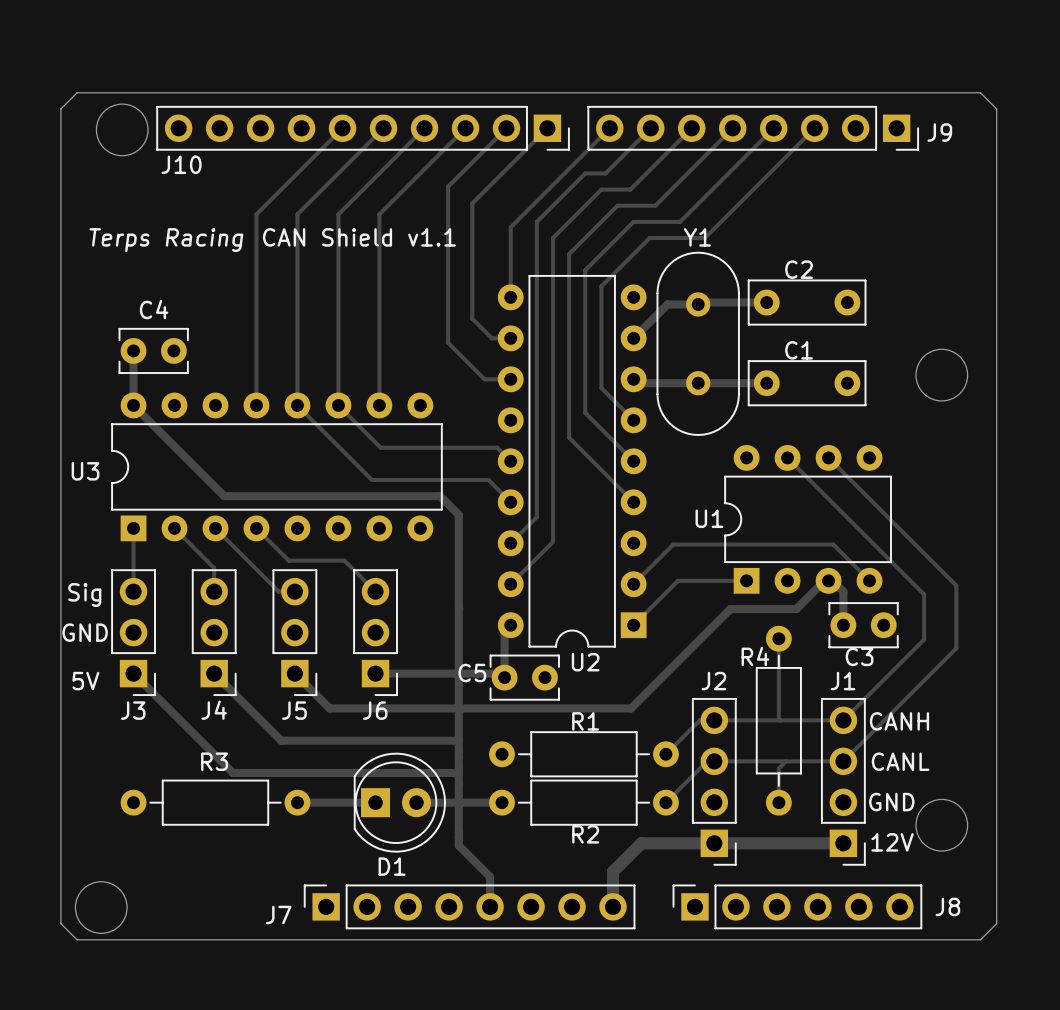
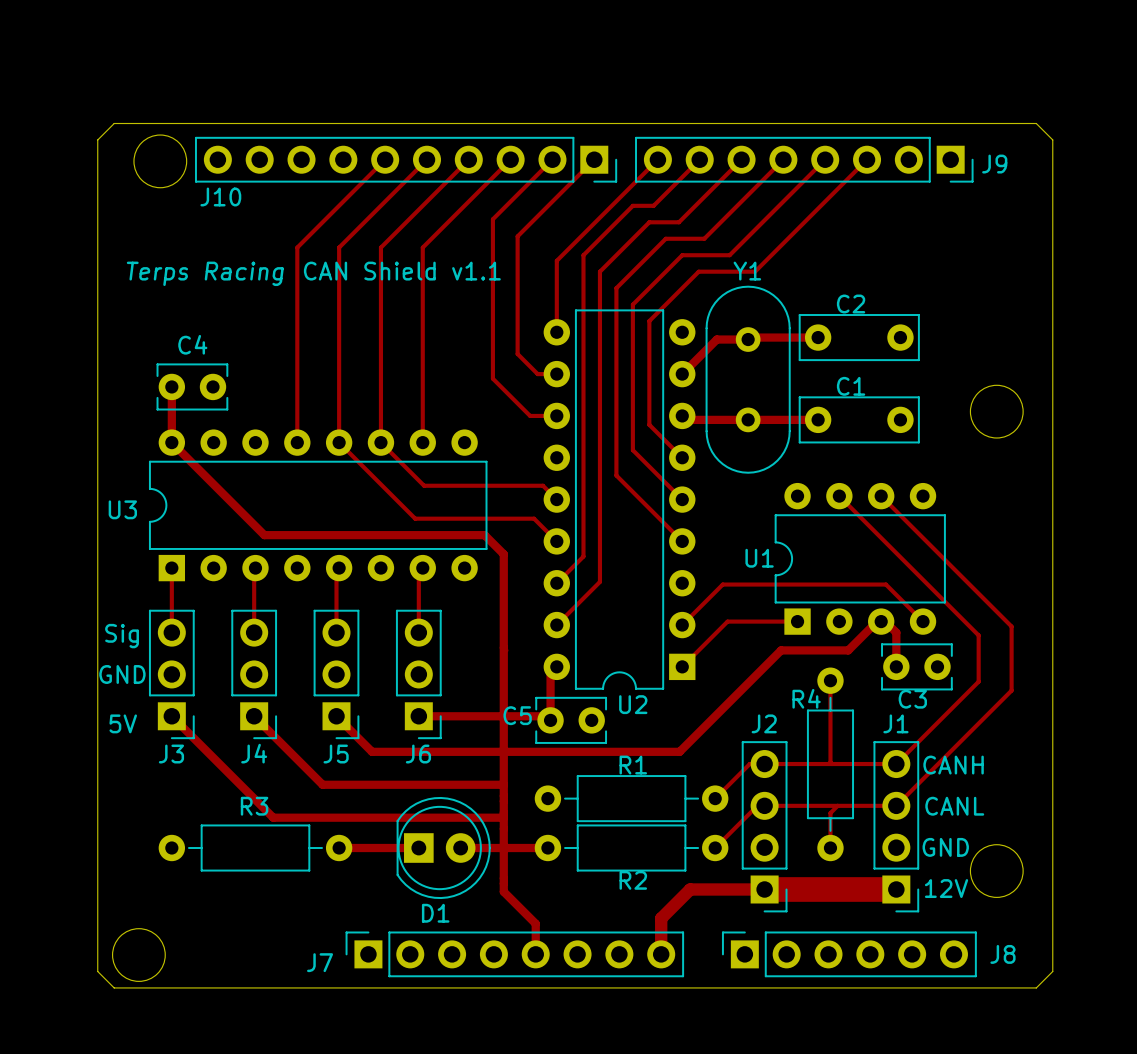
track: (174, 528) (214, 568) -> (255, 568) (254, 608)
track: (215, 528) (278, 591) (294, 591) -> (339, 568) (336, 570) (336, 632)
track: (256, 528) (288, 560) (344, 560) (375, 591) -> (422, 568) (418, 572) (418, 632)
track width: thin (714, 843) (843, 843) -> thick (764, 889) (896, 889)

